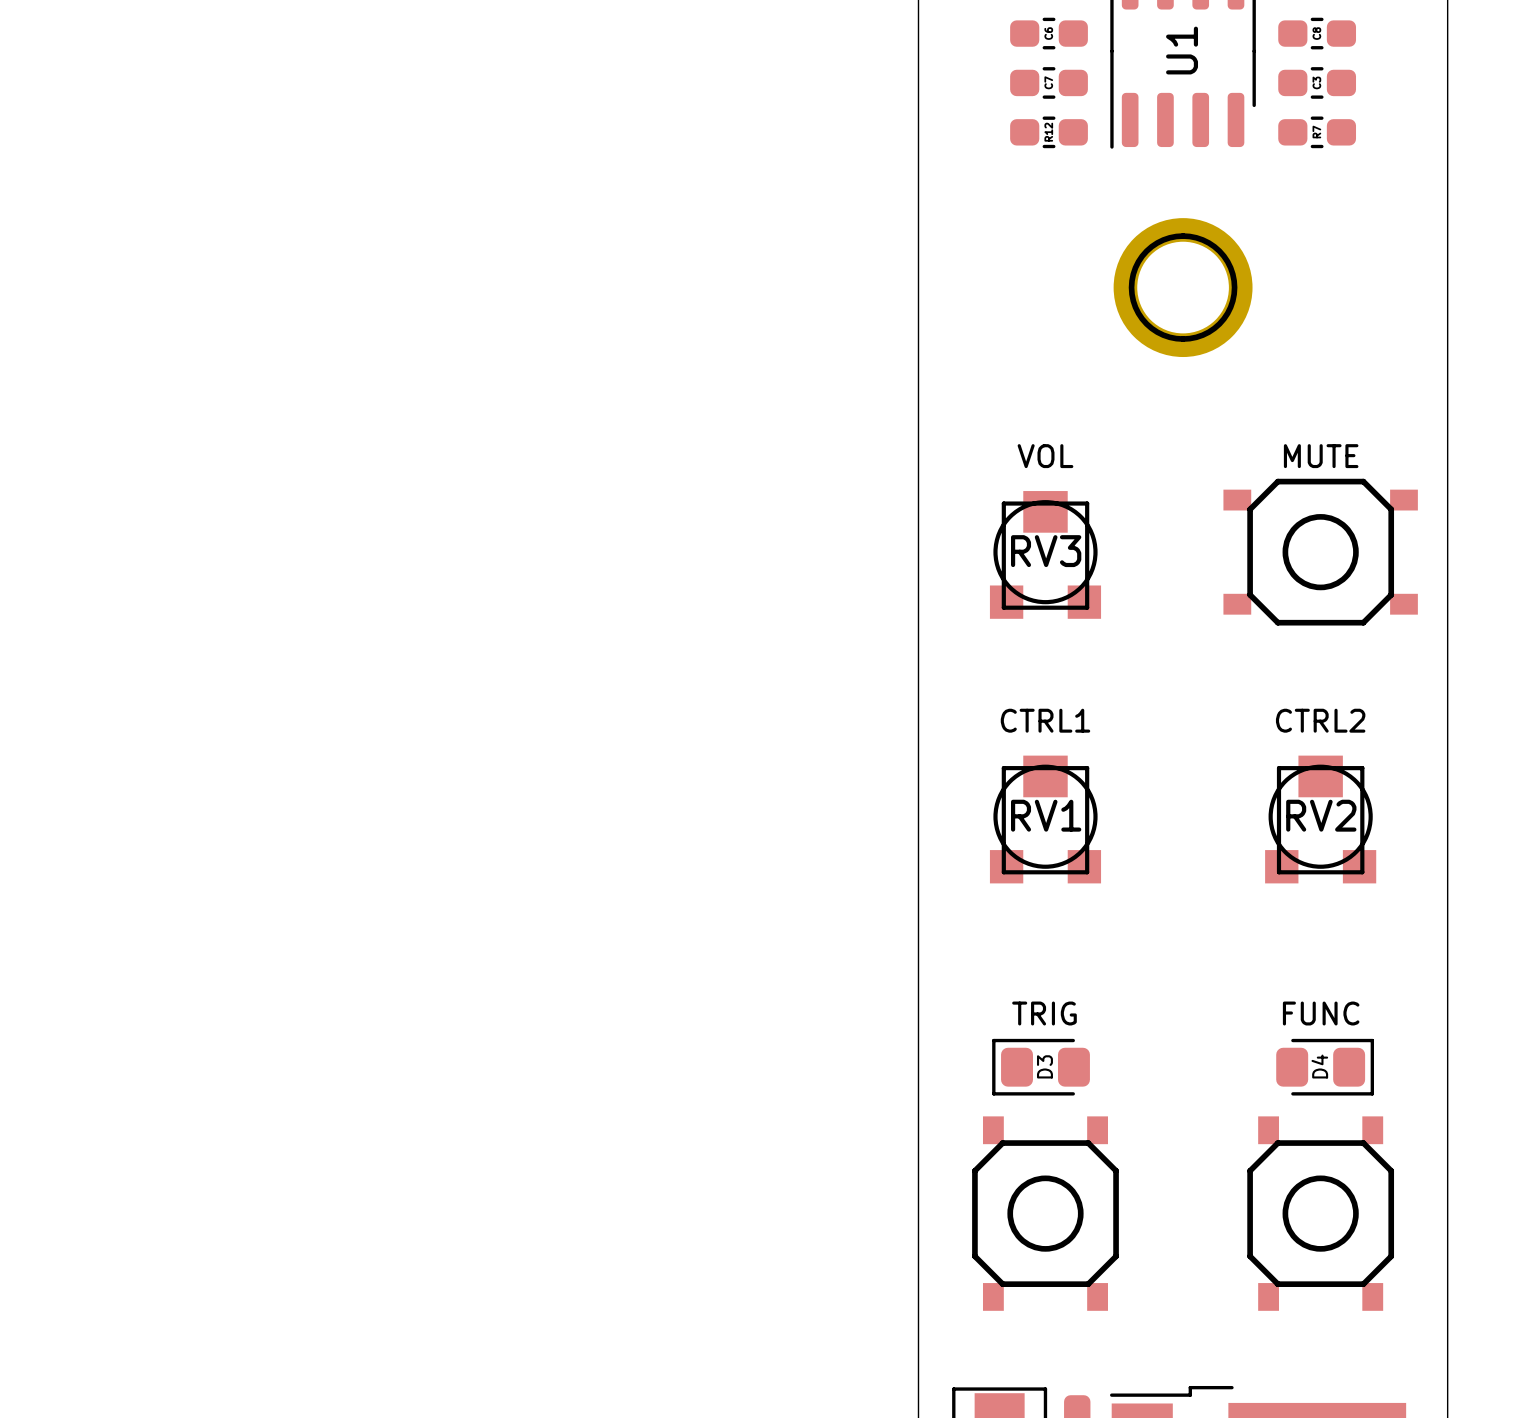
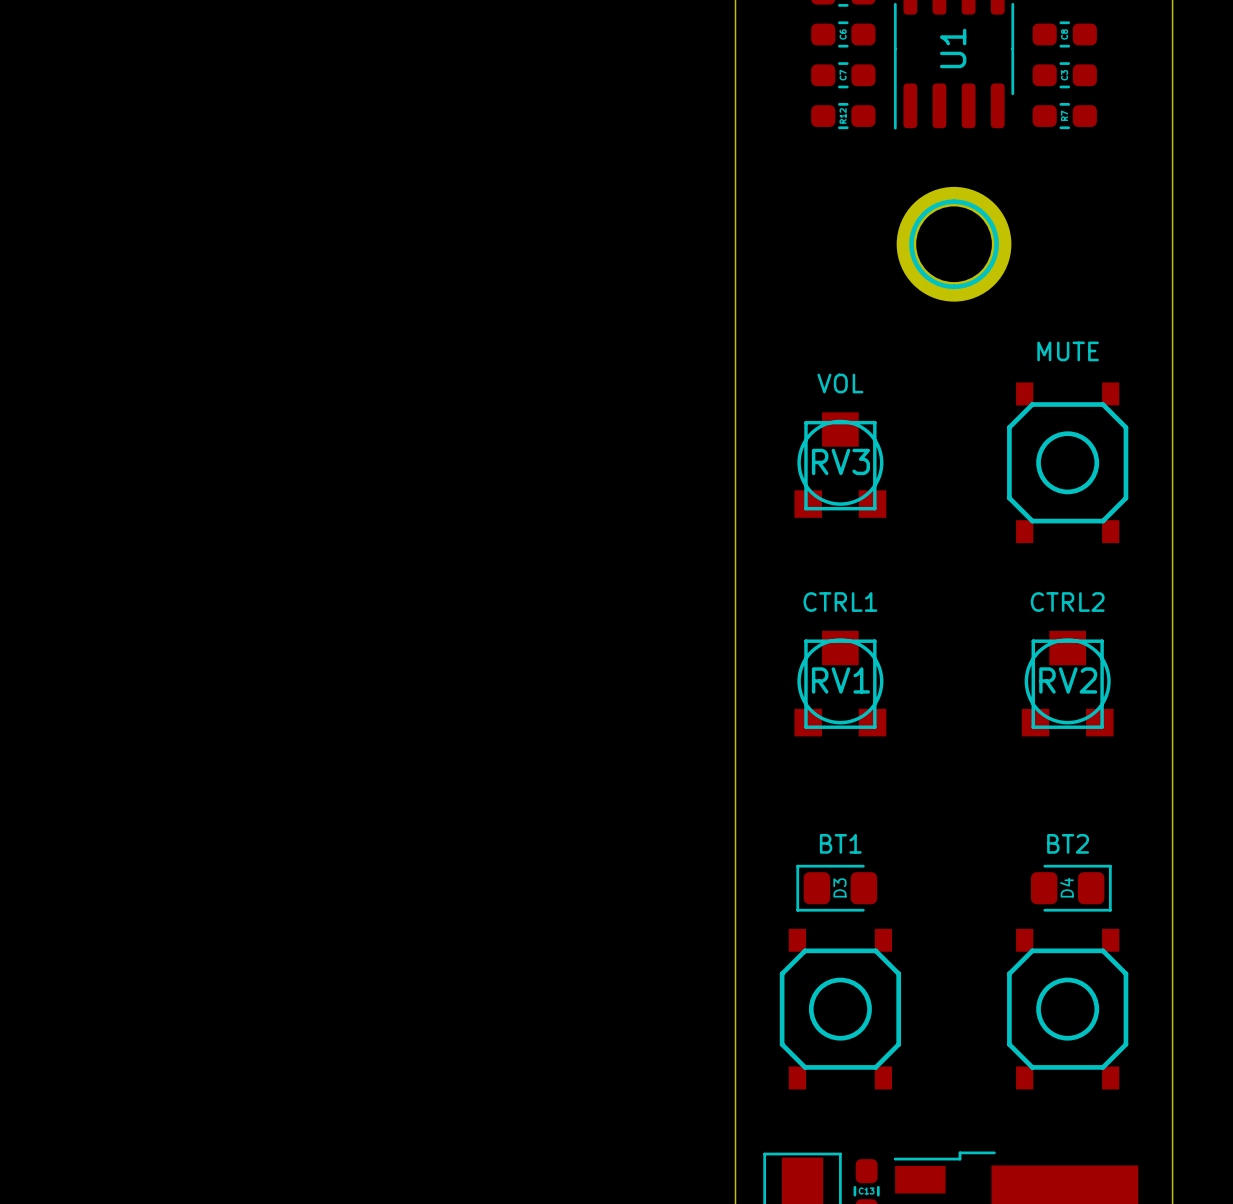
text position: MUTE (1321, 456) -> MUTE (1068, 351)
part rotation: 0° (1320, 552) -> 90° clockwise (1067, 462)
text: TRIG (1044, 1013) -> BT1 (840, 843)
text: FUNC (1321, 1013) -> BT2 (1068, 843)

